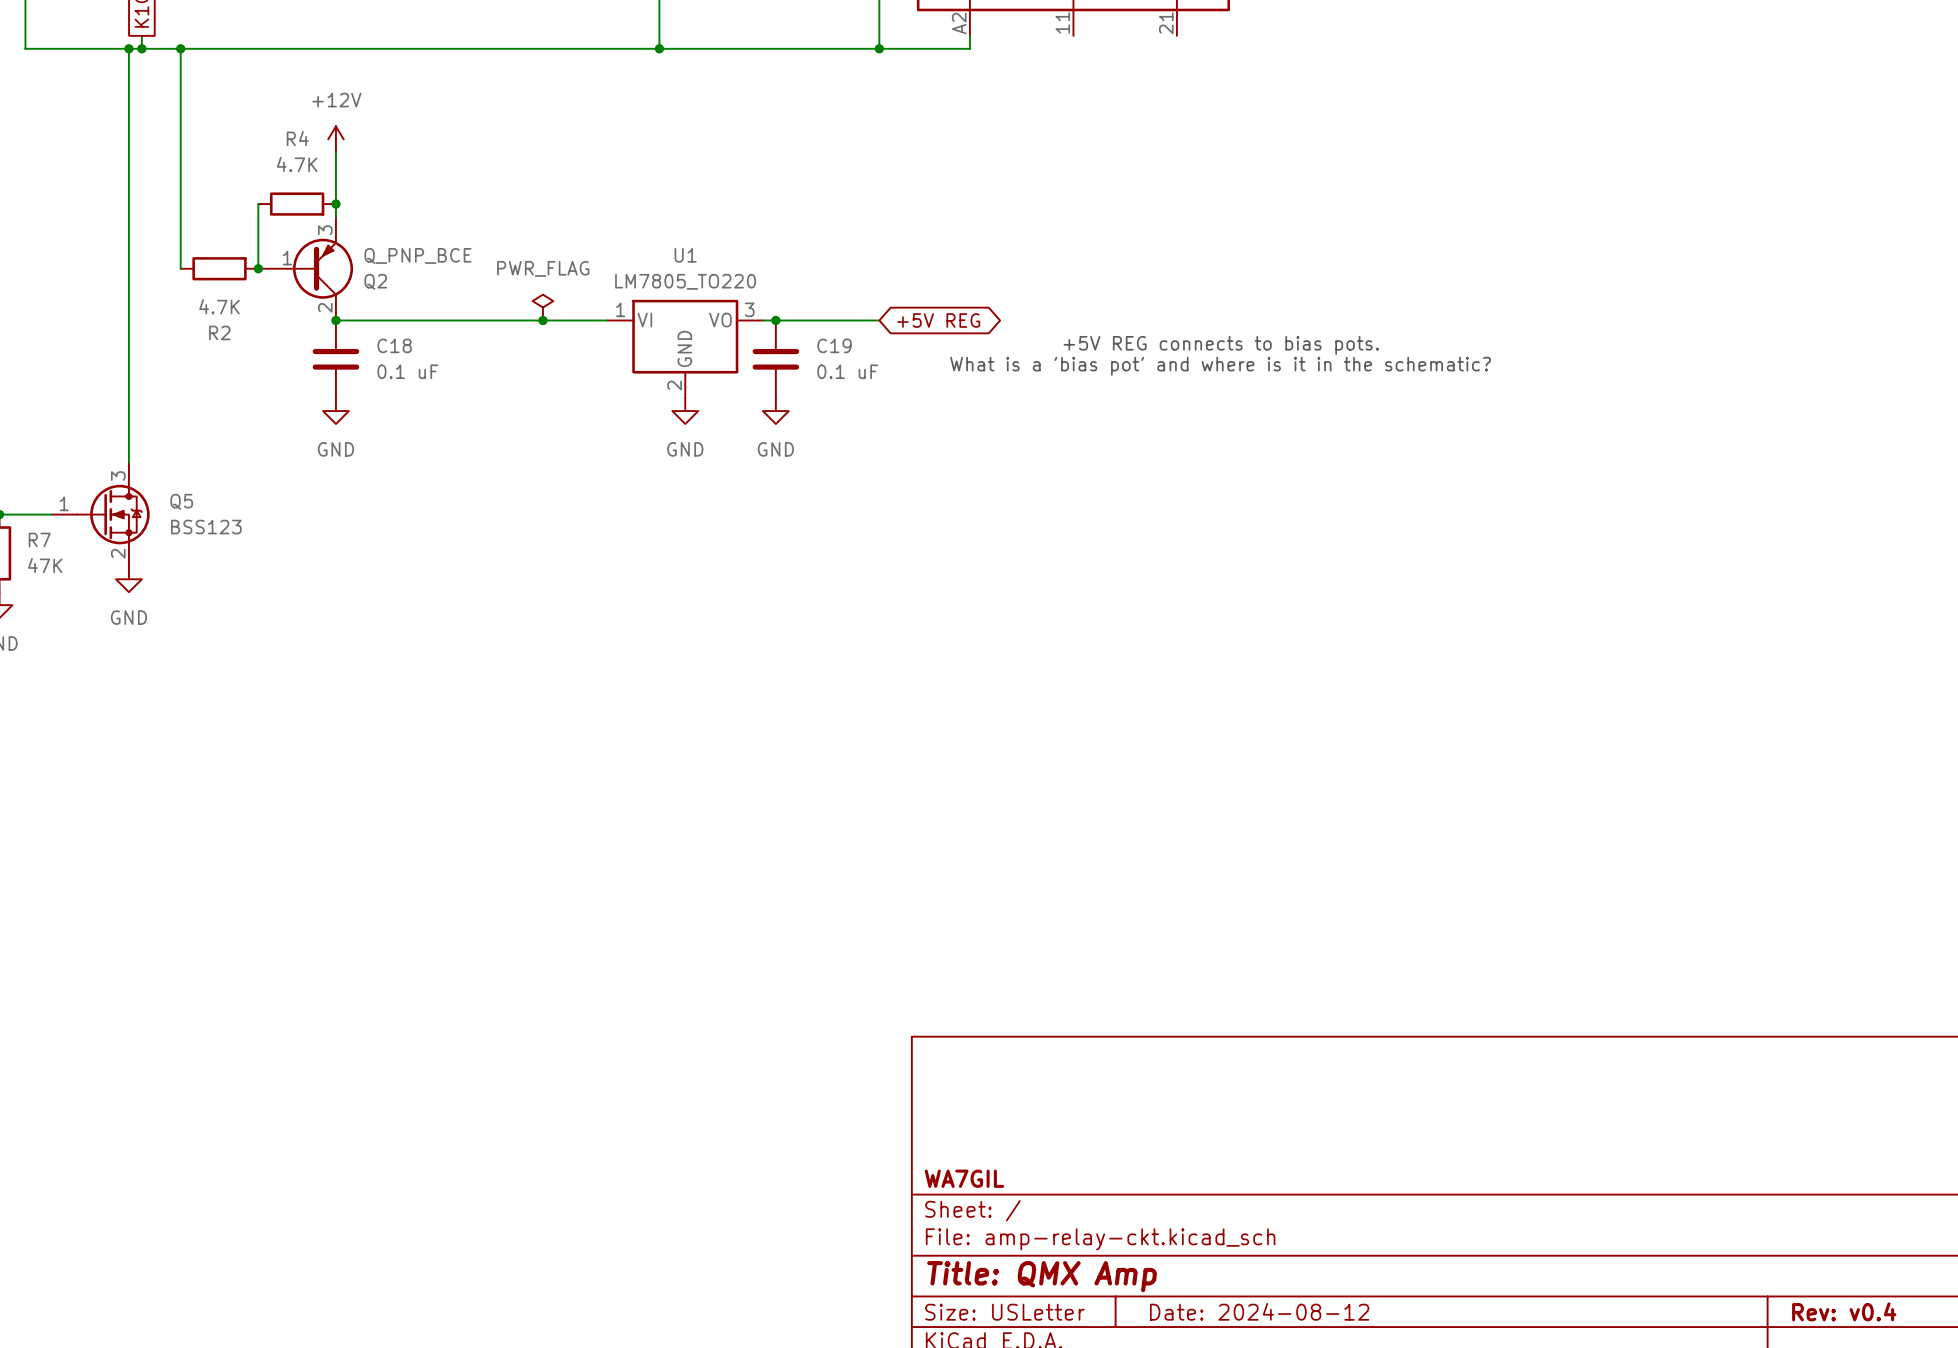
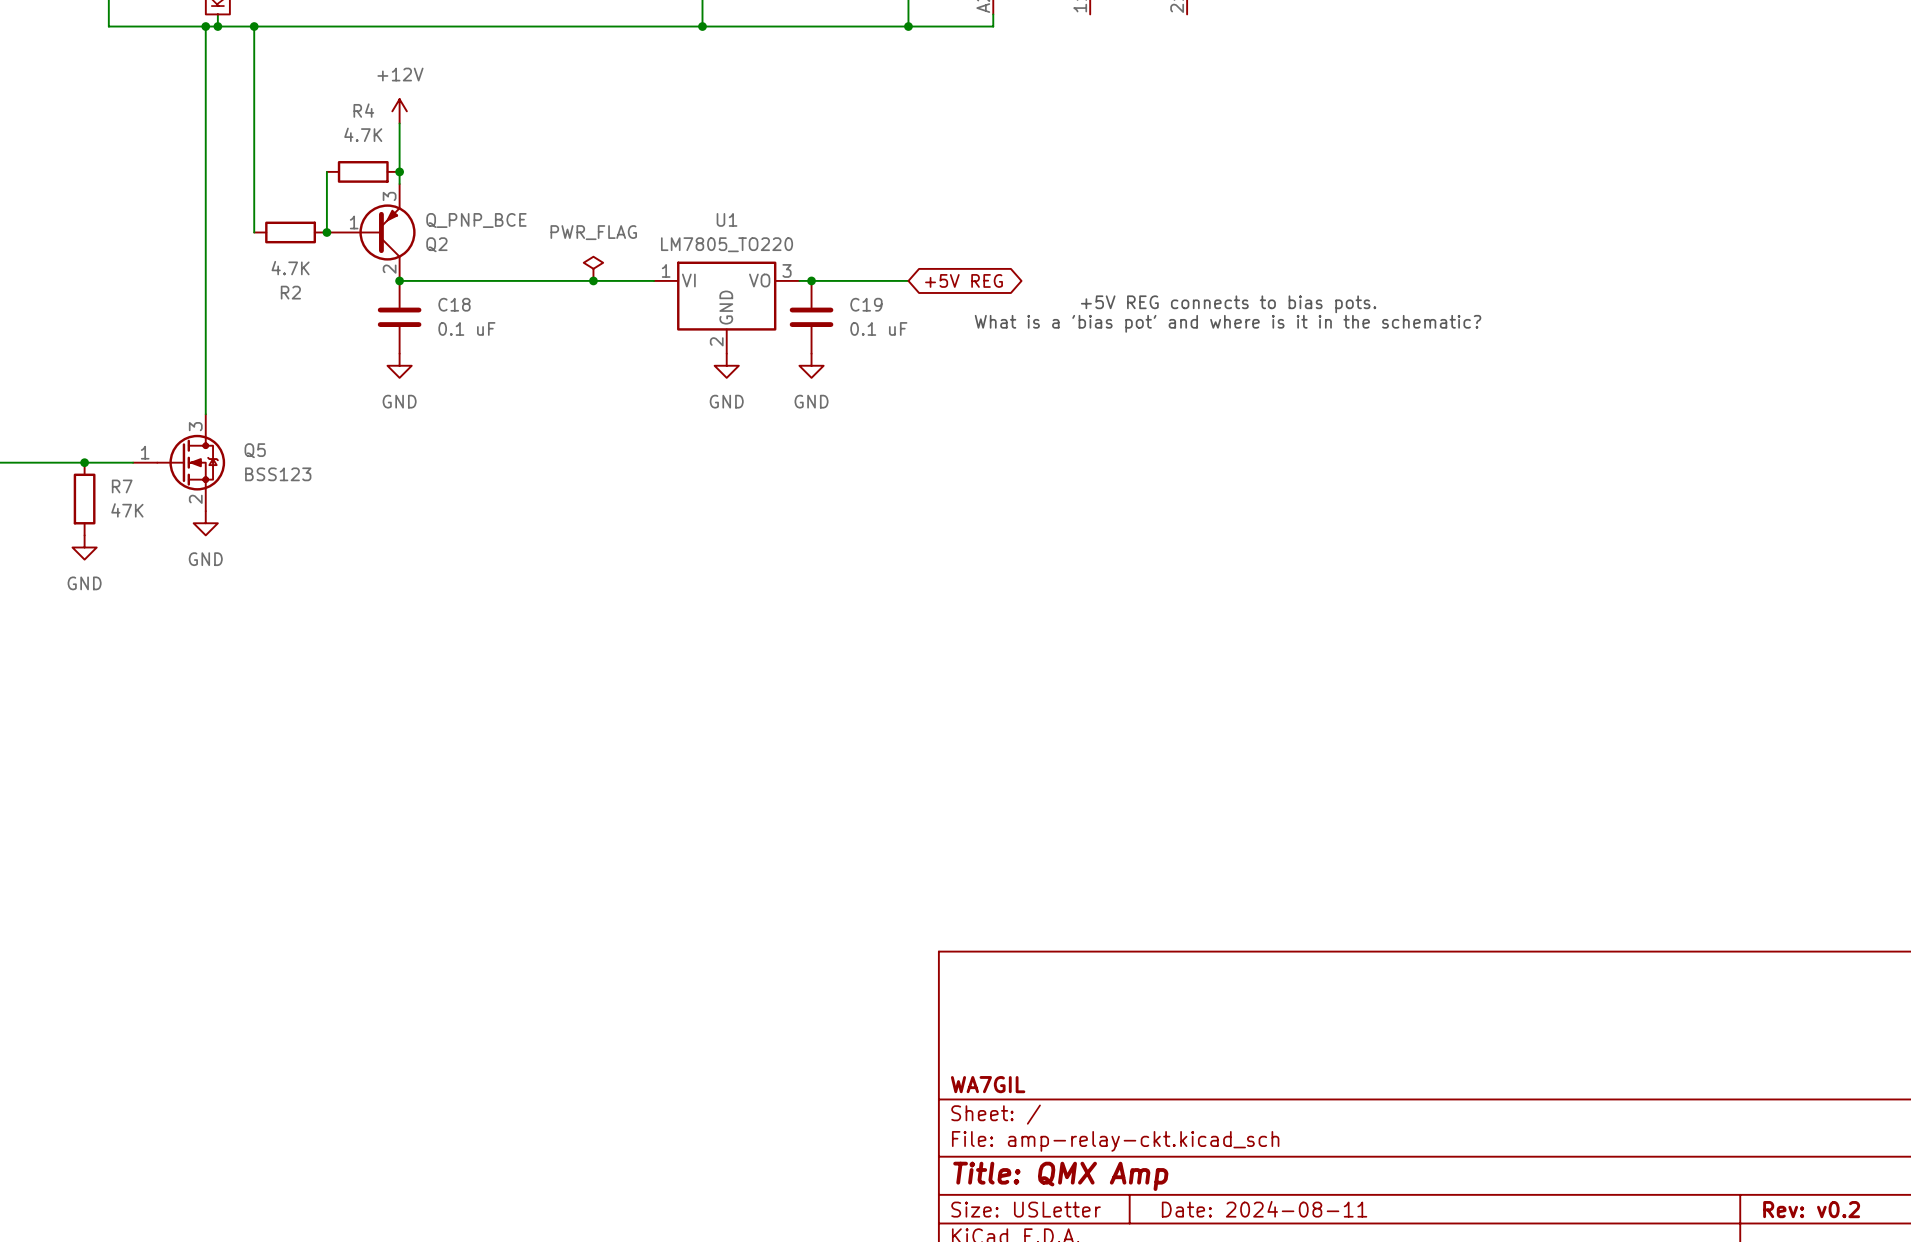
title block: Date: 2024-08-12 (1259, 1311) -> Date: 2024-08-11 (1264, 1209)
title block: Rev: v0.4 (1844, 1311) -> Rev: v0.2 (1811, 1209)

